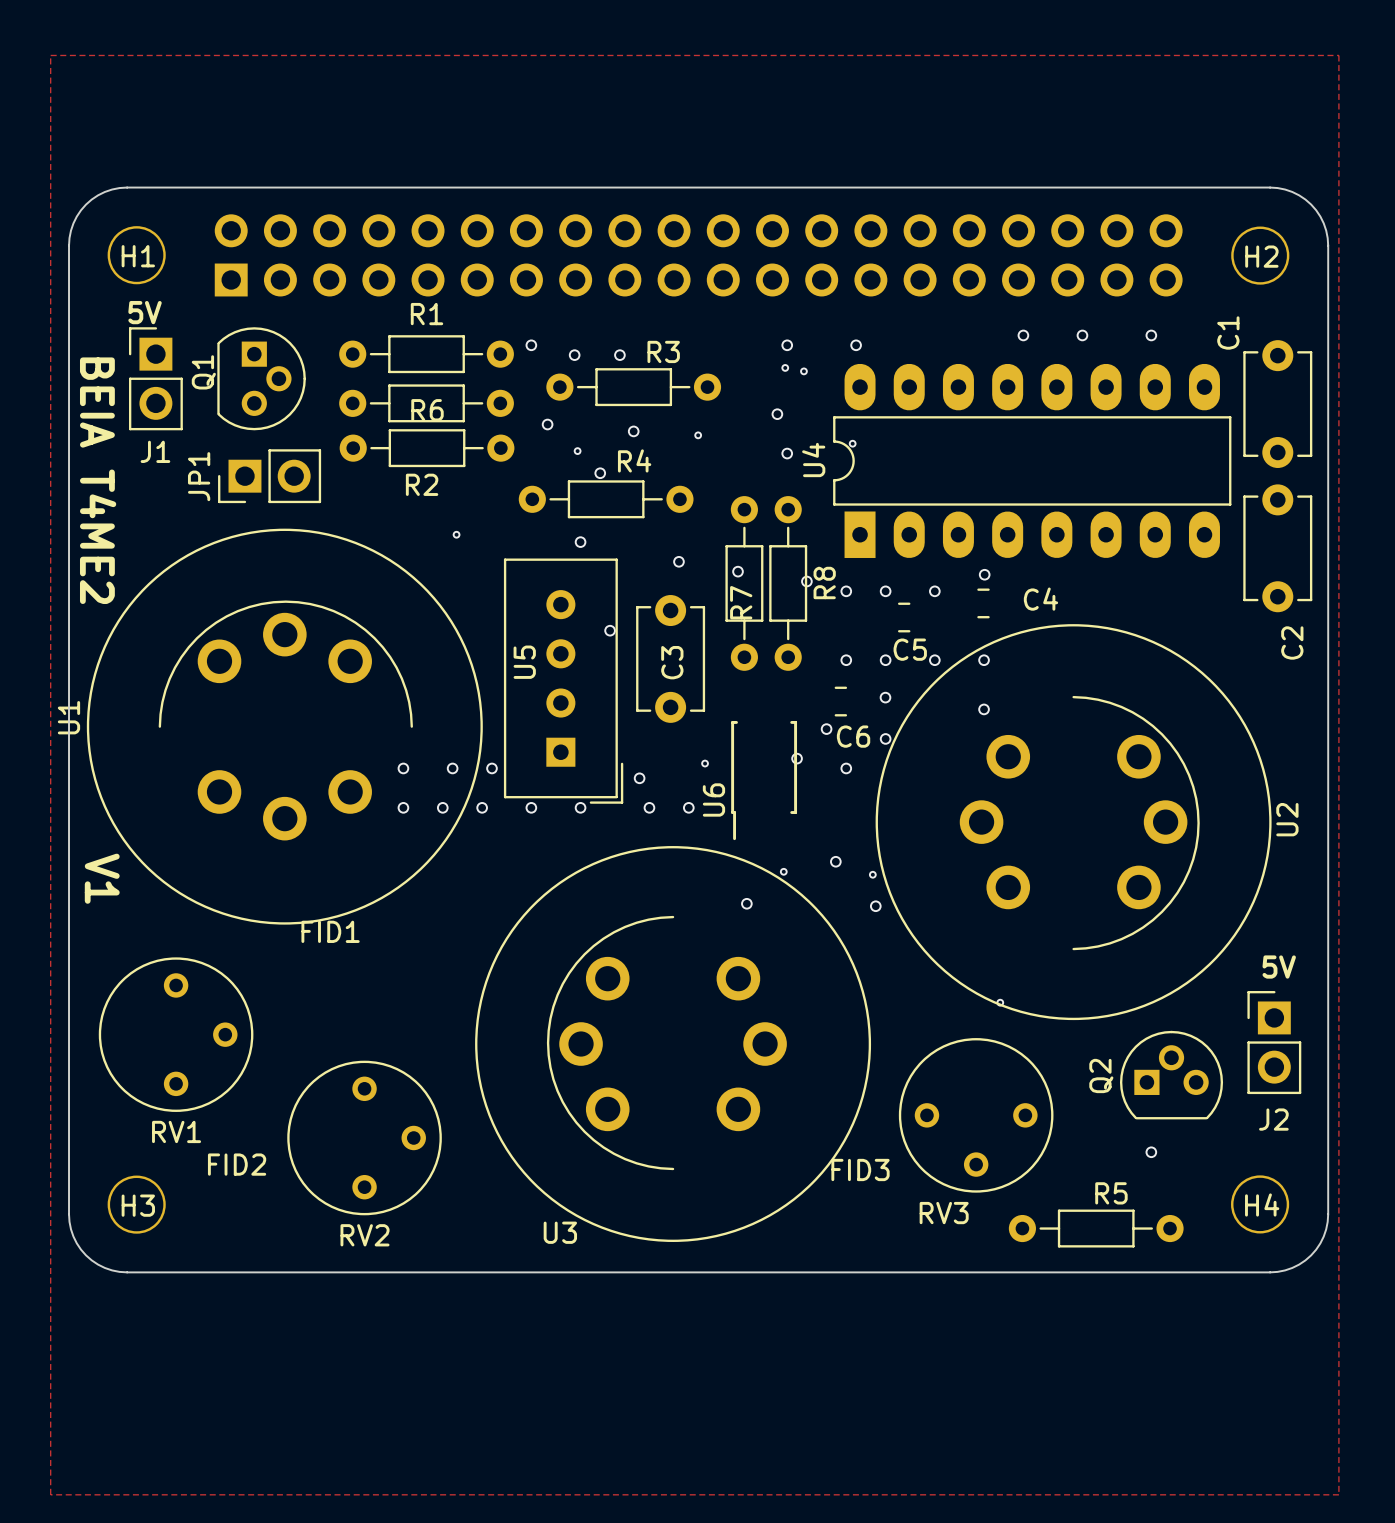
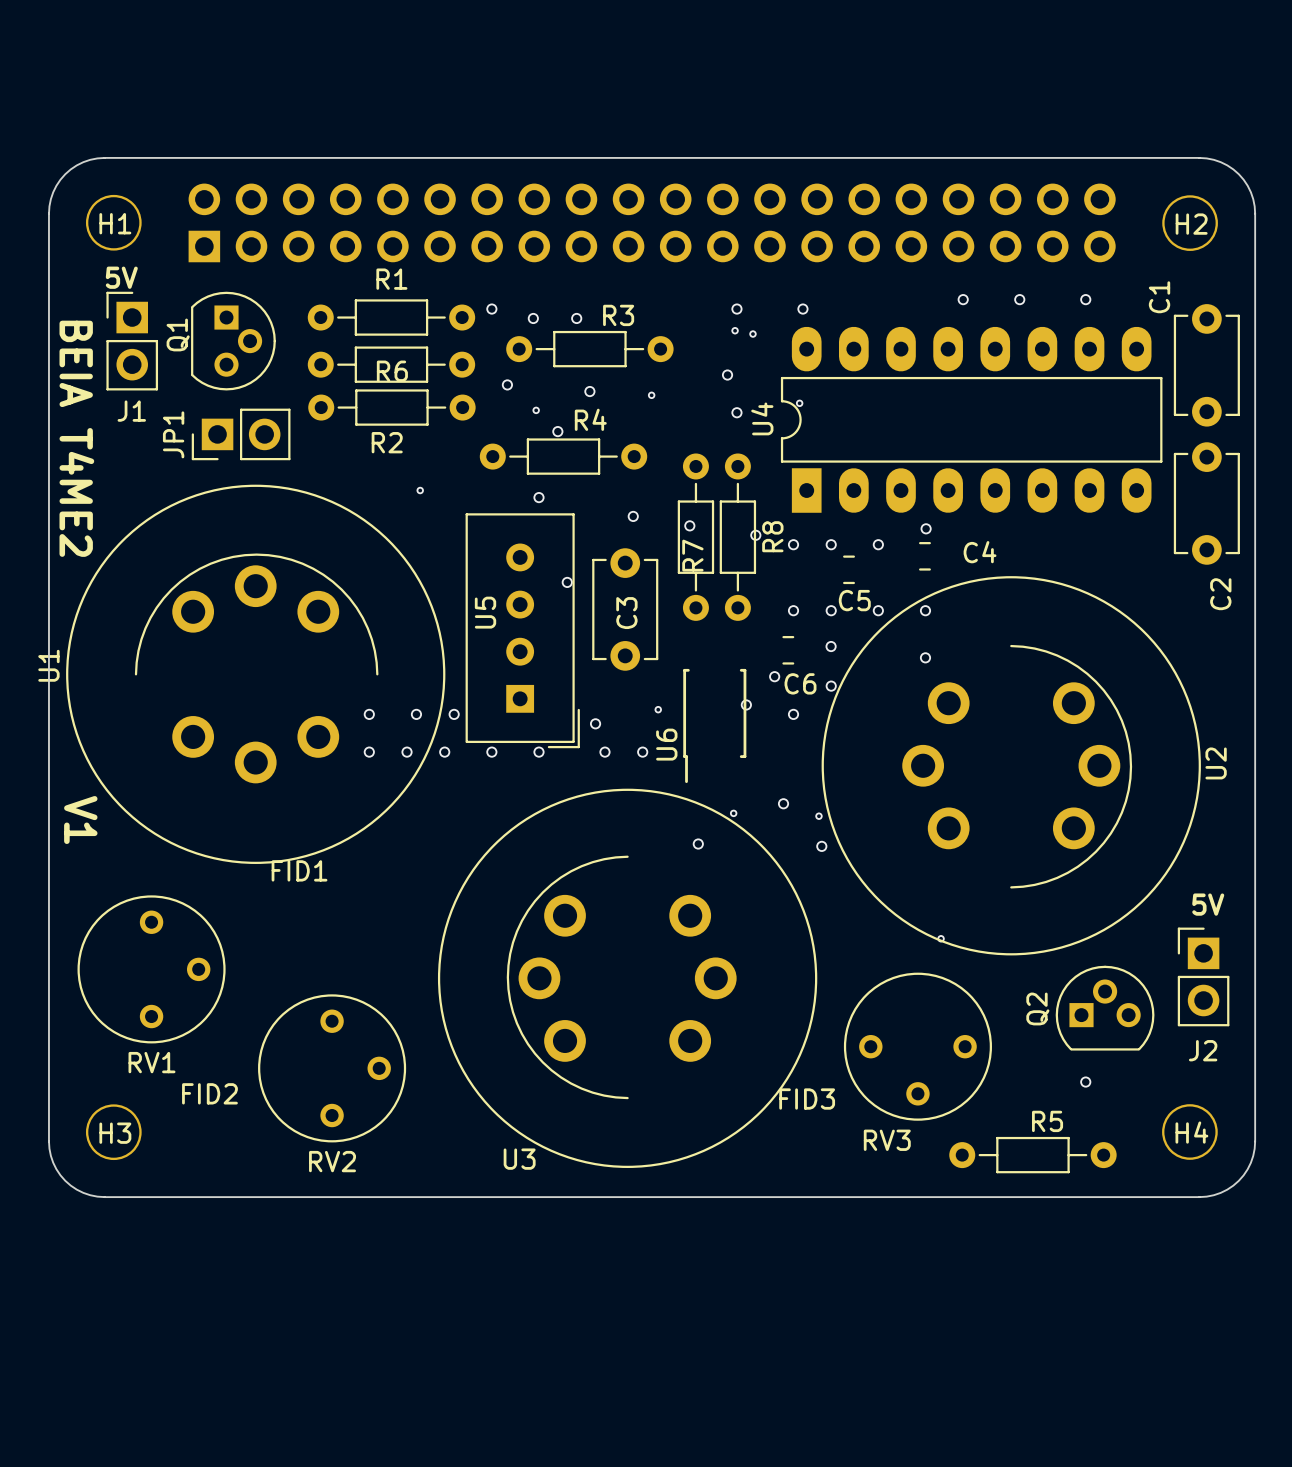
zone outline: (50, 55) (50, 1494) (1338, 1494) (1338, 55) (50, 55) -> none

